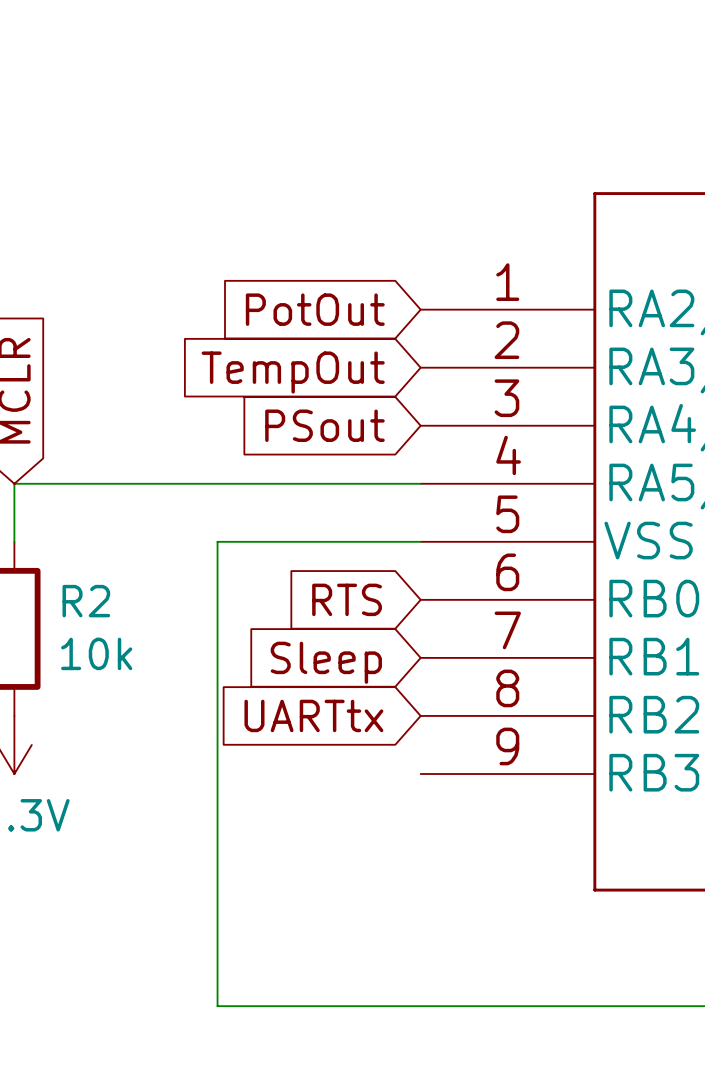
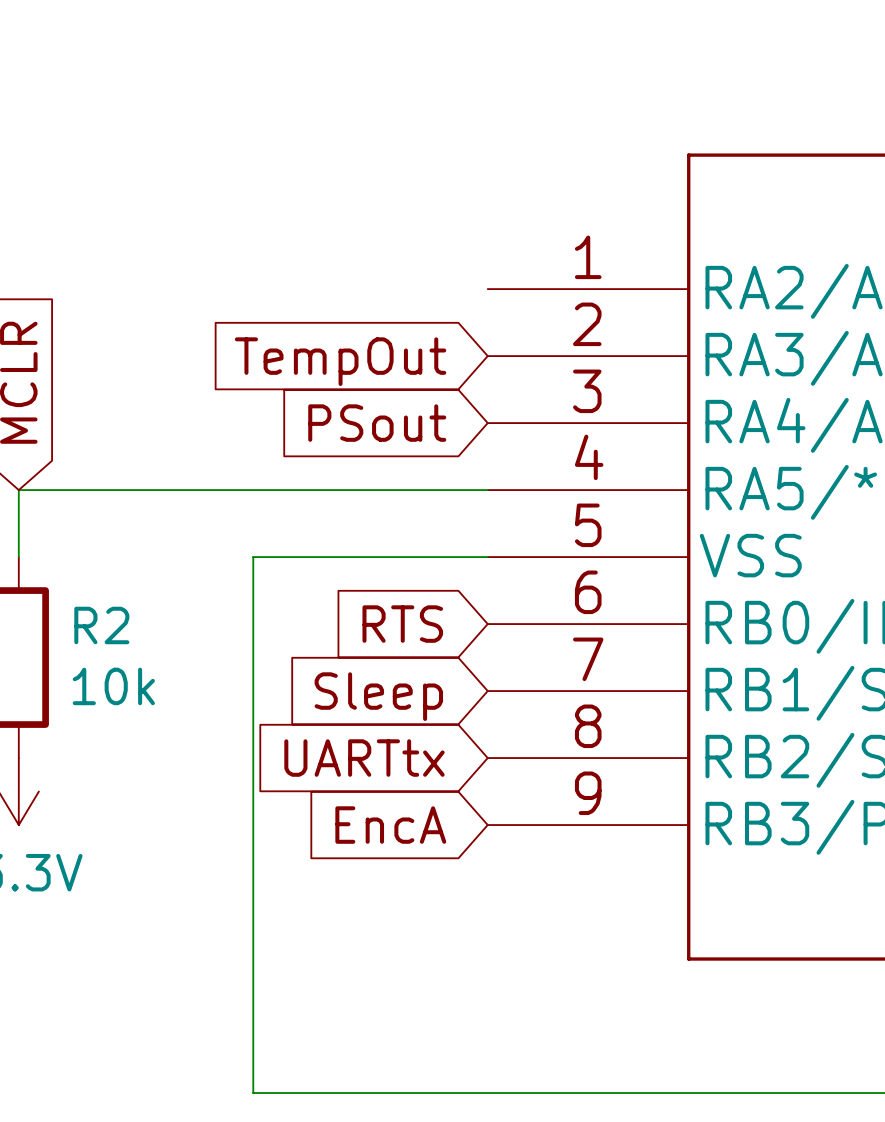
global label: PotOut (315, 309) -> none
global label: none -> EncA (390, 825)

